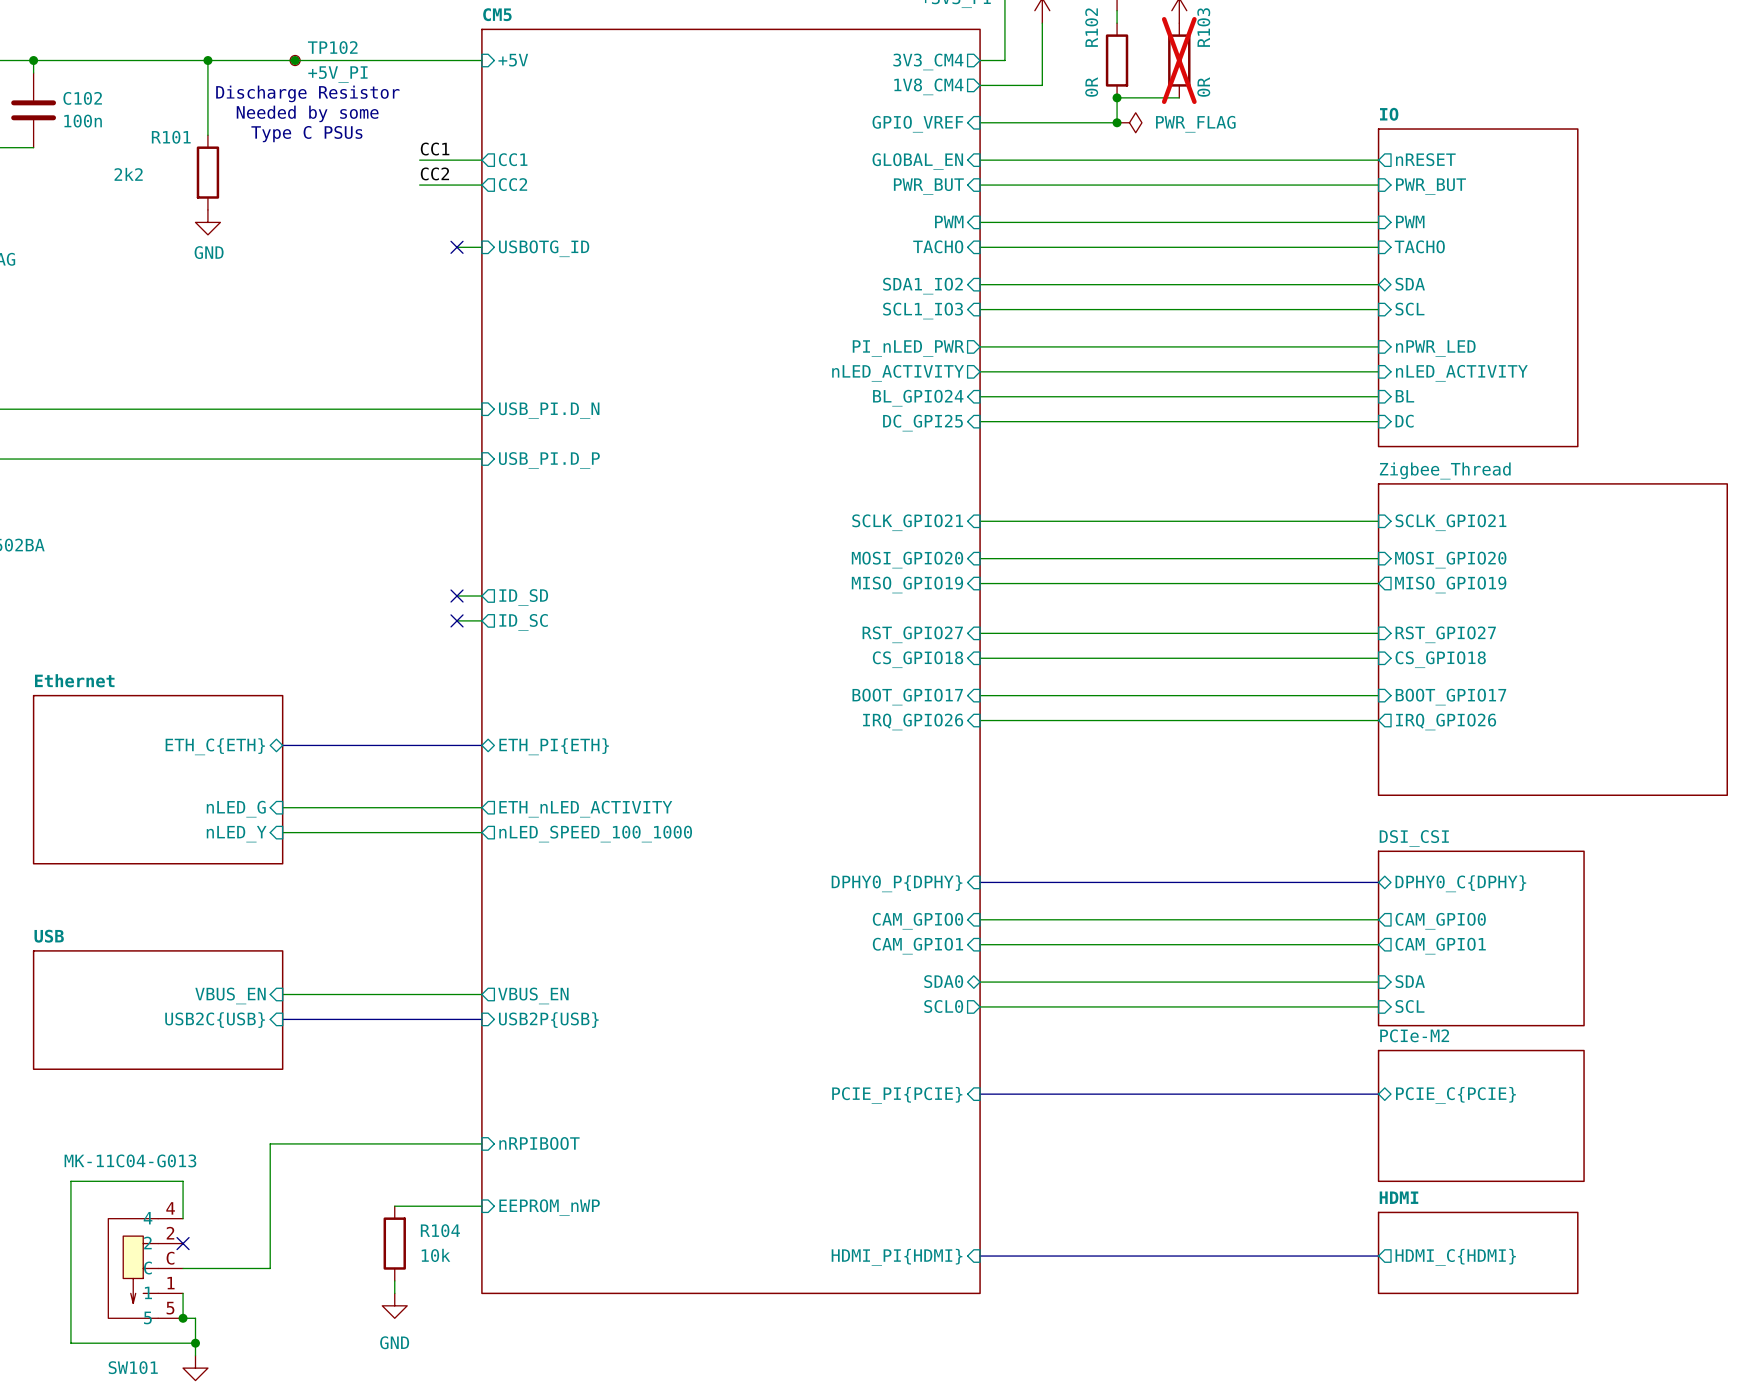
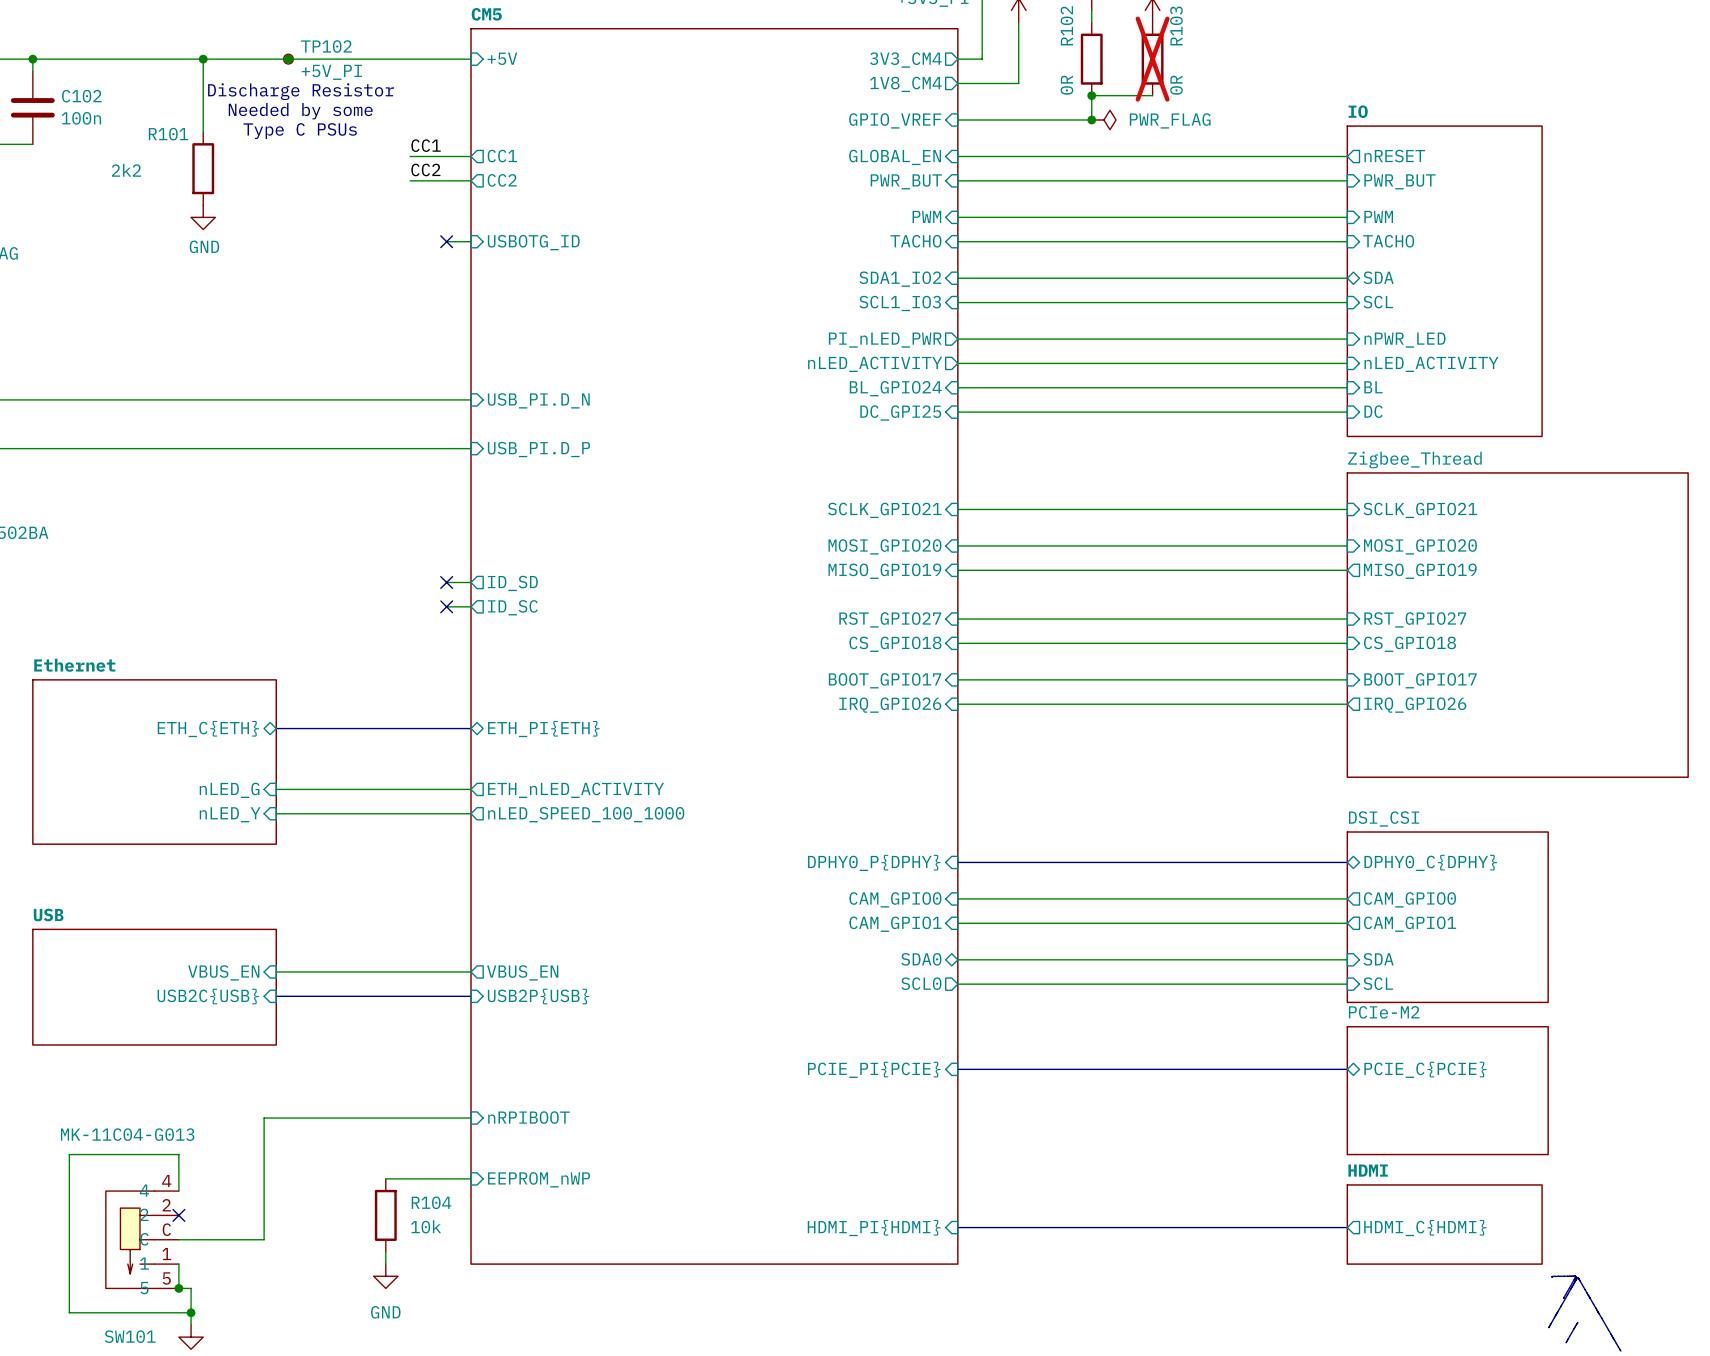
line: none -> (1574, 1276) (1552, 1276)
line: none -> (1575, 1276) (1563, 1298)
line: none -> (1577, 1277) (1557, 1313)
line: none -> (1578, 1277) (1589, 1296)
line: none -> (1589, 1297) (1598, 1312)
line: none -> (1598, 1312) (1613, 1338)
line: none -> (1556, 1313) (1548, 1327)
line: none -> (1577, 1322) (1566, 1342)
line: none -> (1613, 1339) (1620, 1351)

